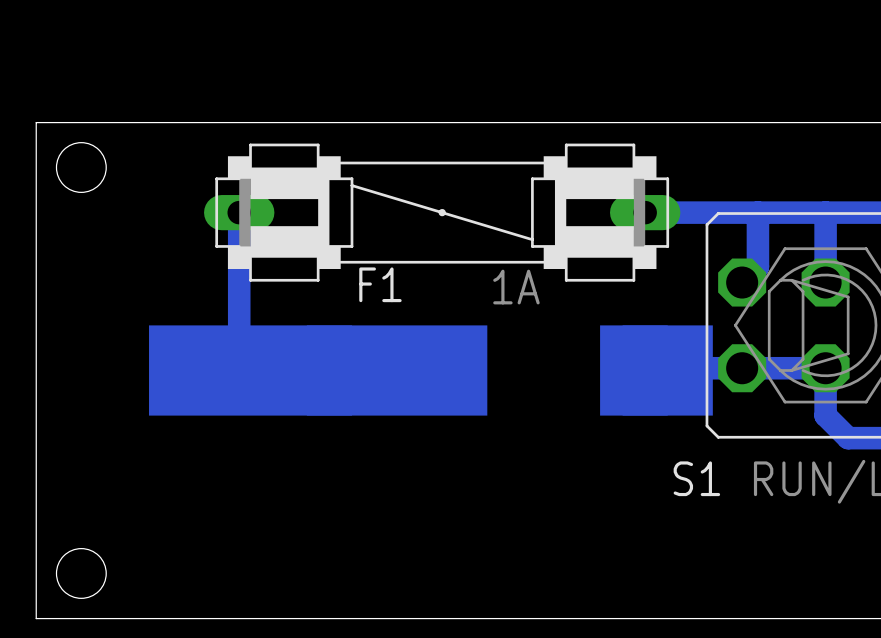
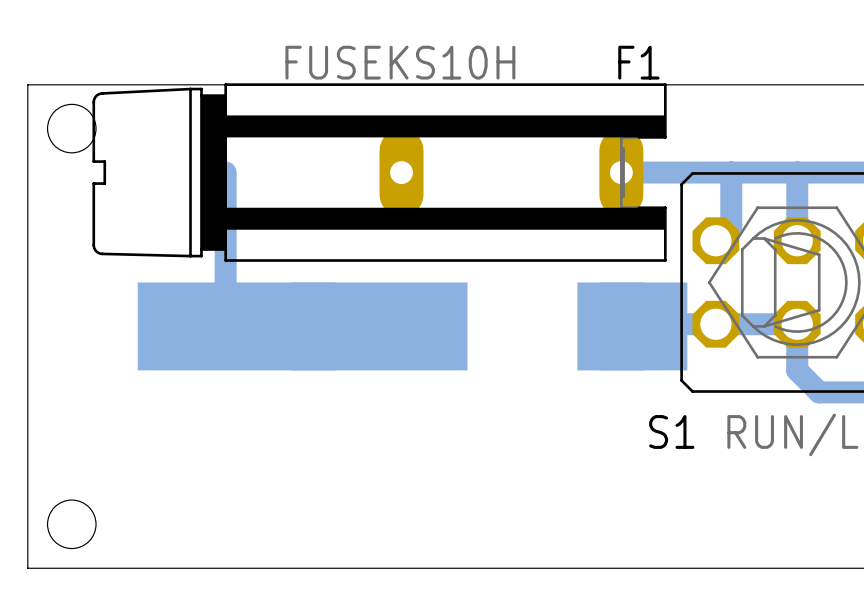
F1 footprint: [204, 143, 681, 282] -> [92, 83, 667, 262]
F1 name position: F1 (380, 284) -> F1 (638, 62)
F1 value: 1A (516, 287) -> FUSEKS10H (400, 62)

